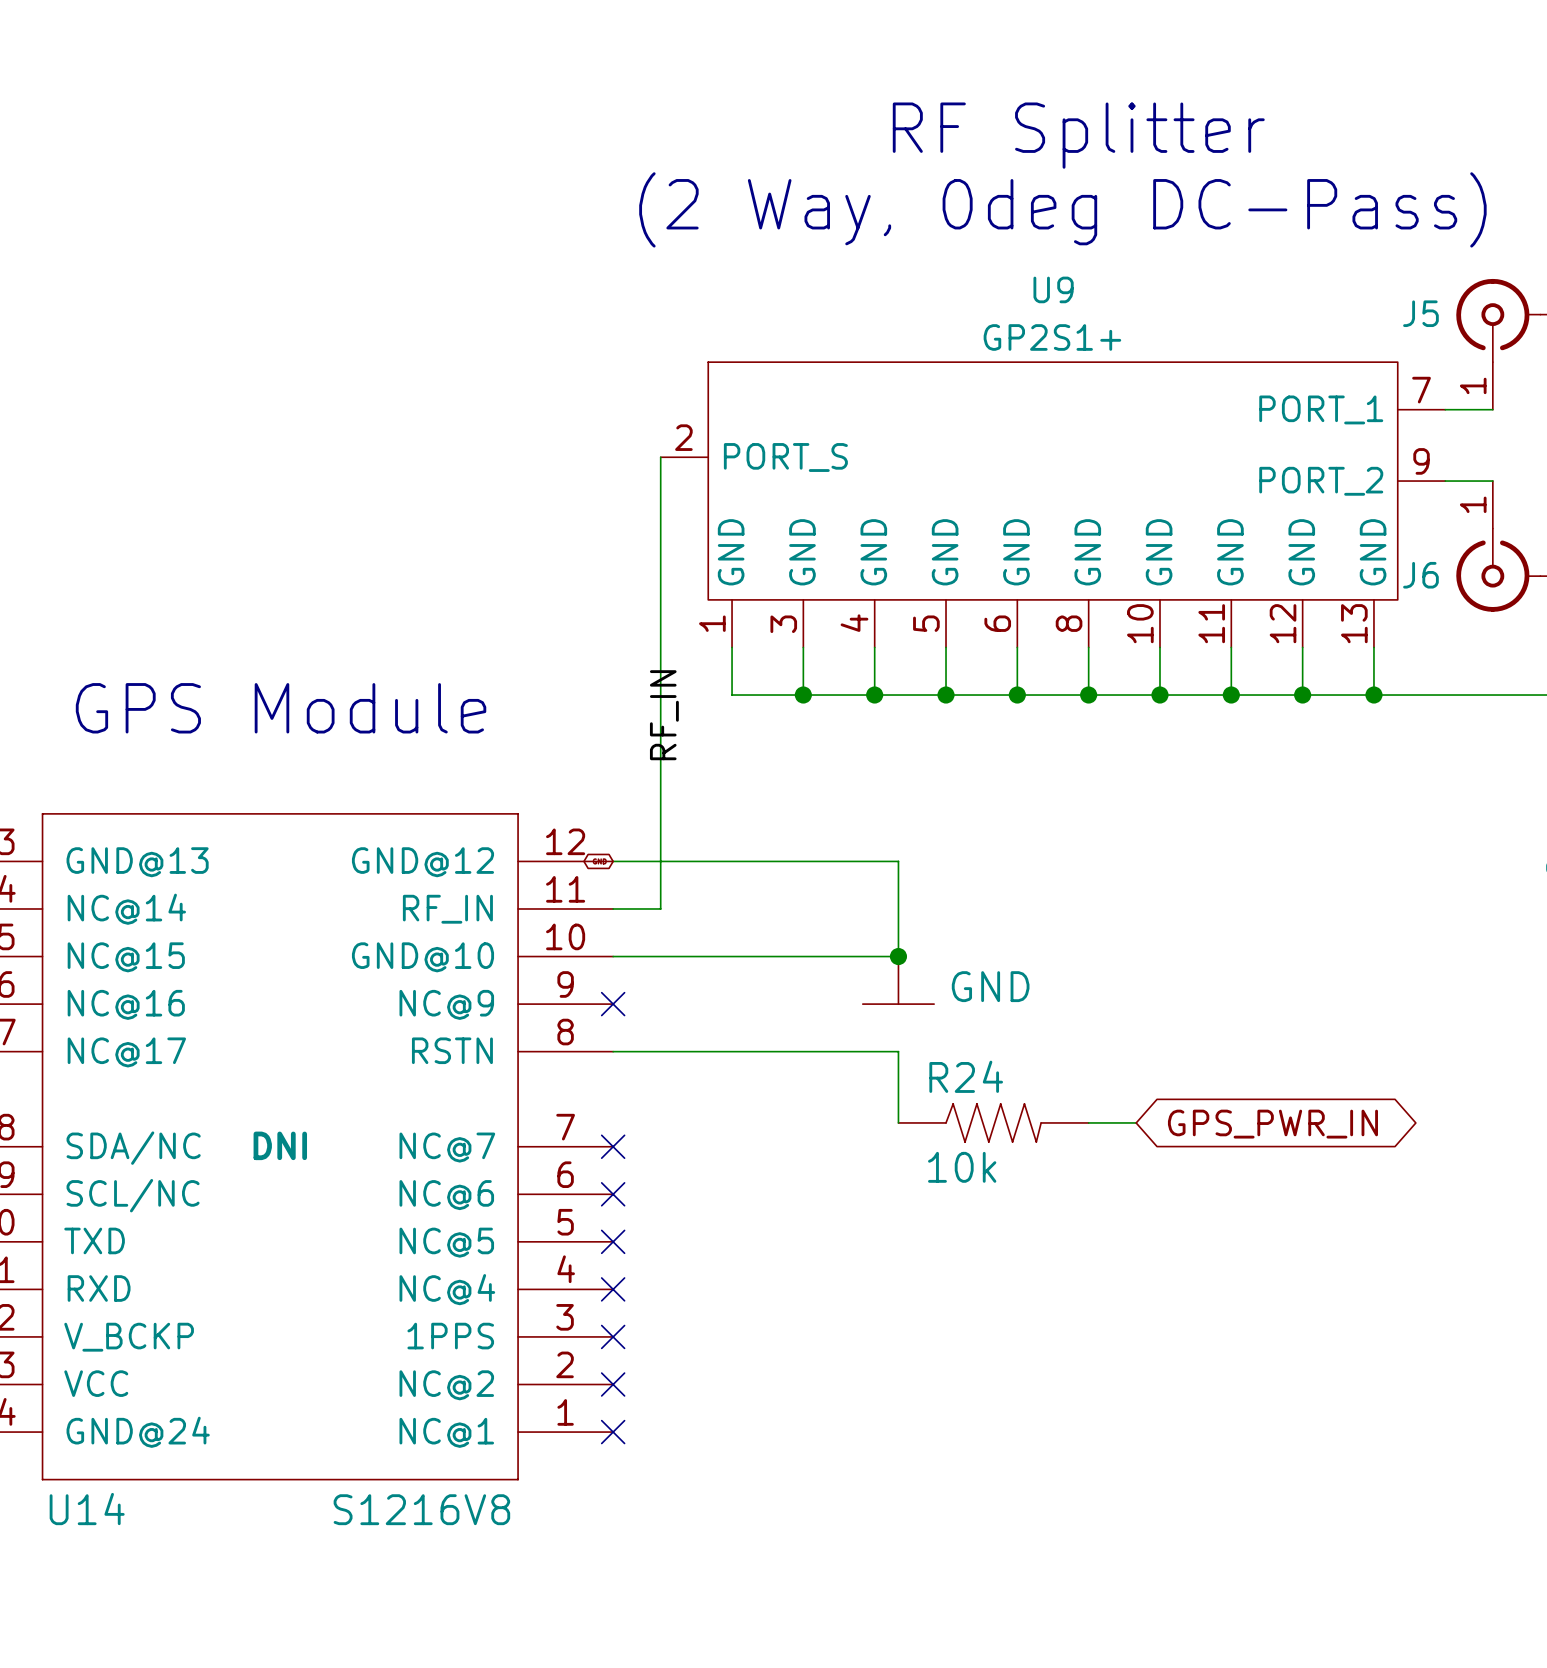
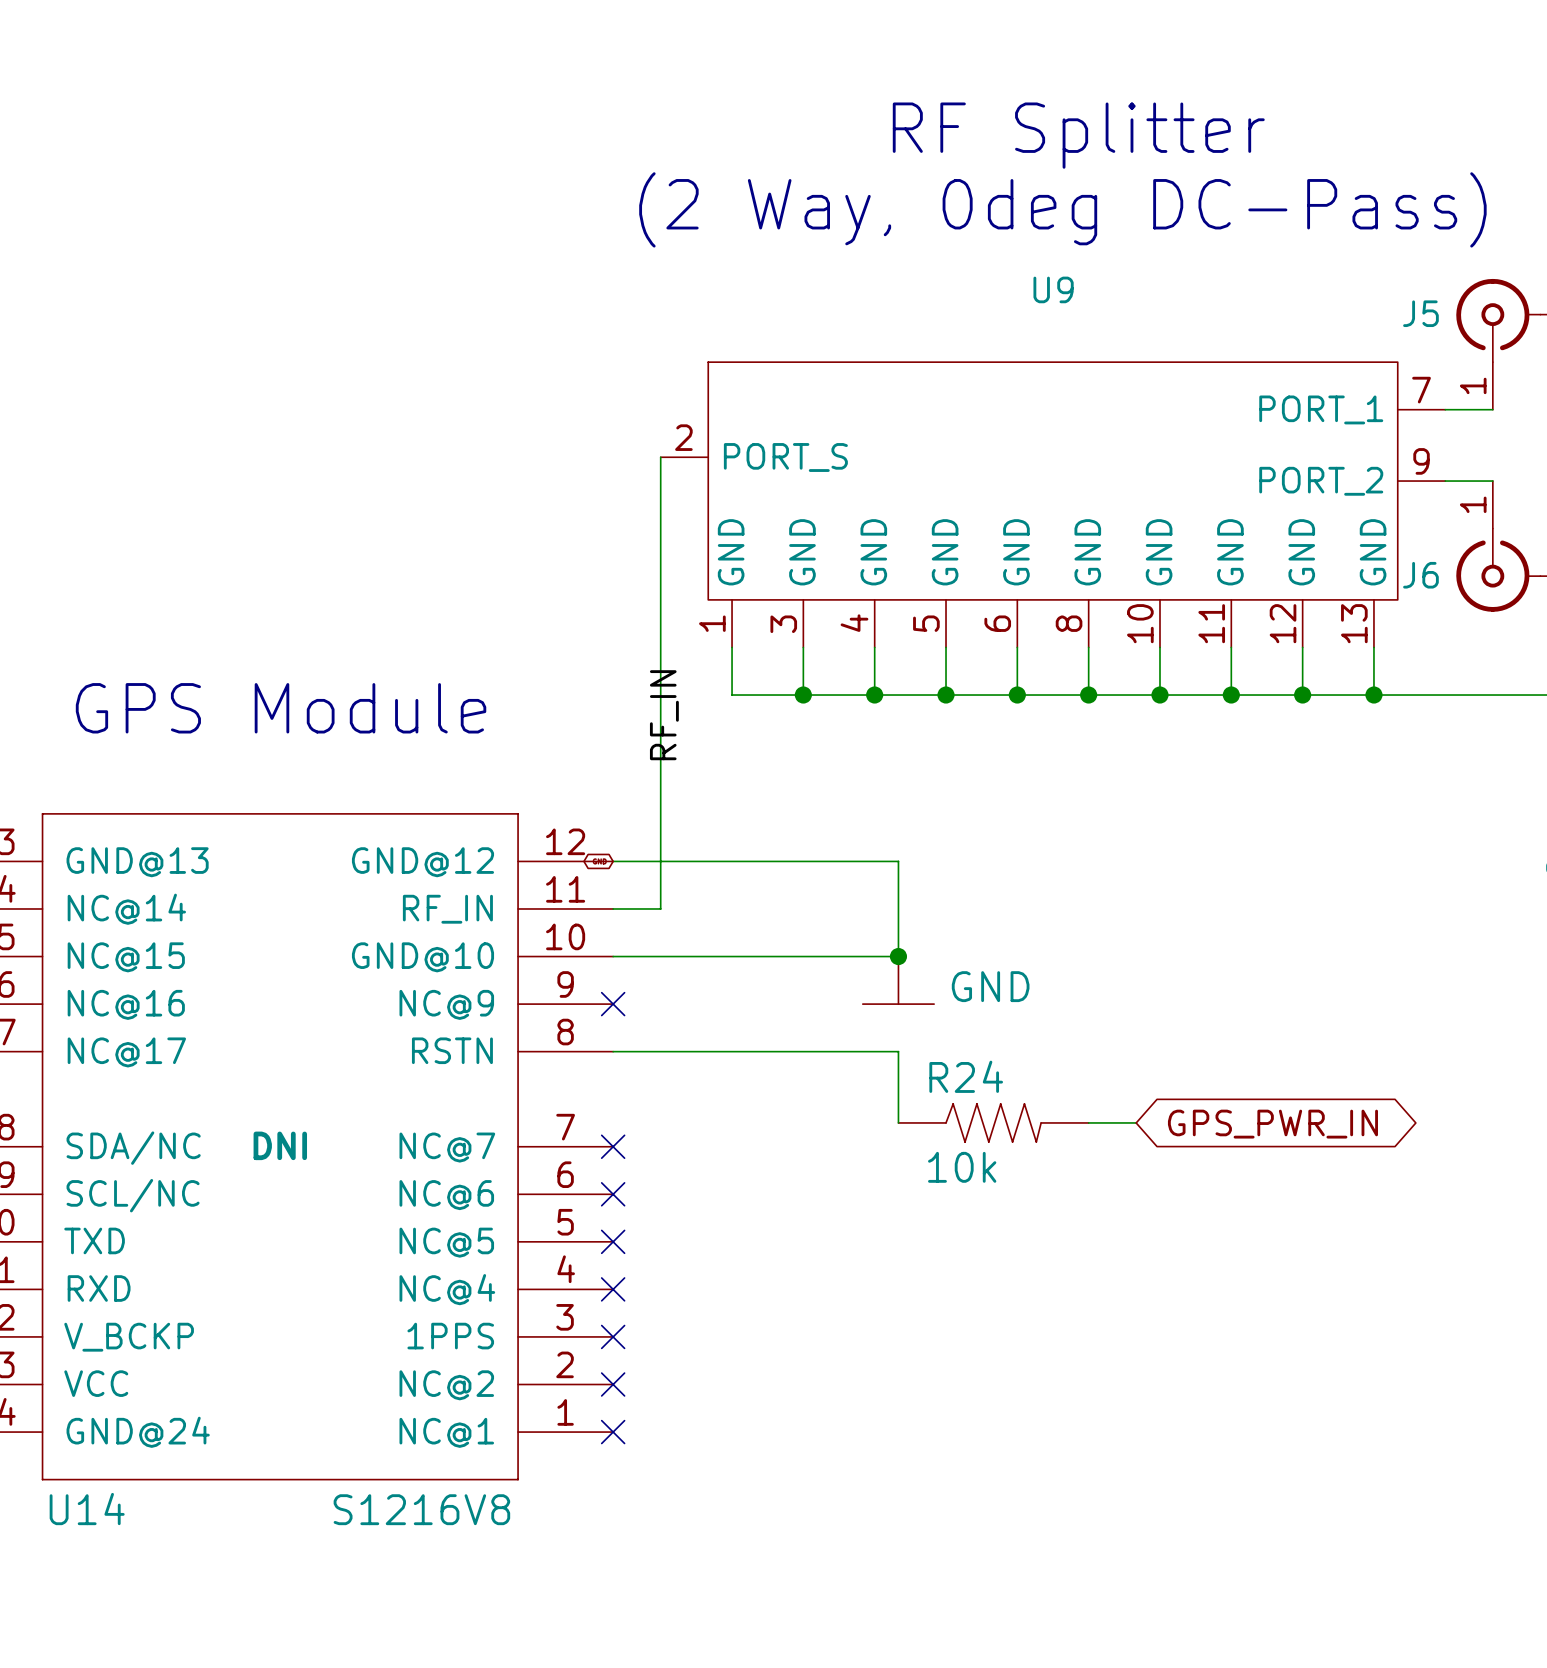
U9 value: GP2S1+ (1052, 337) -> none

